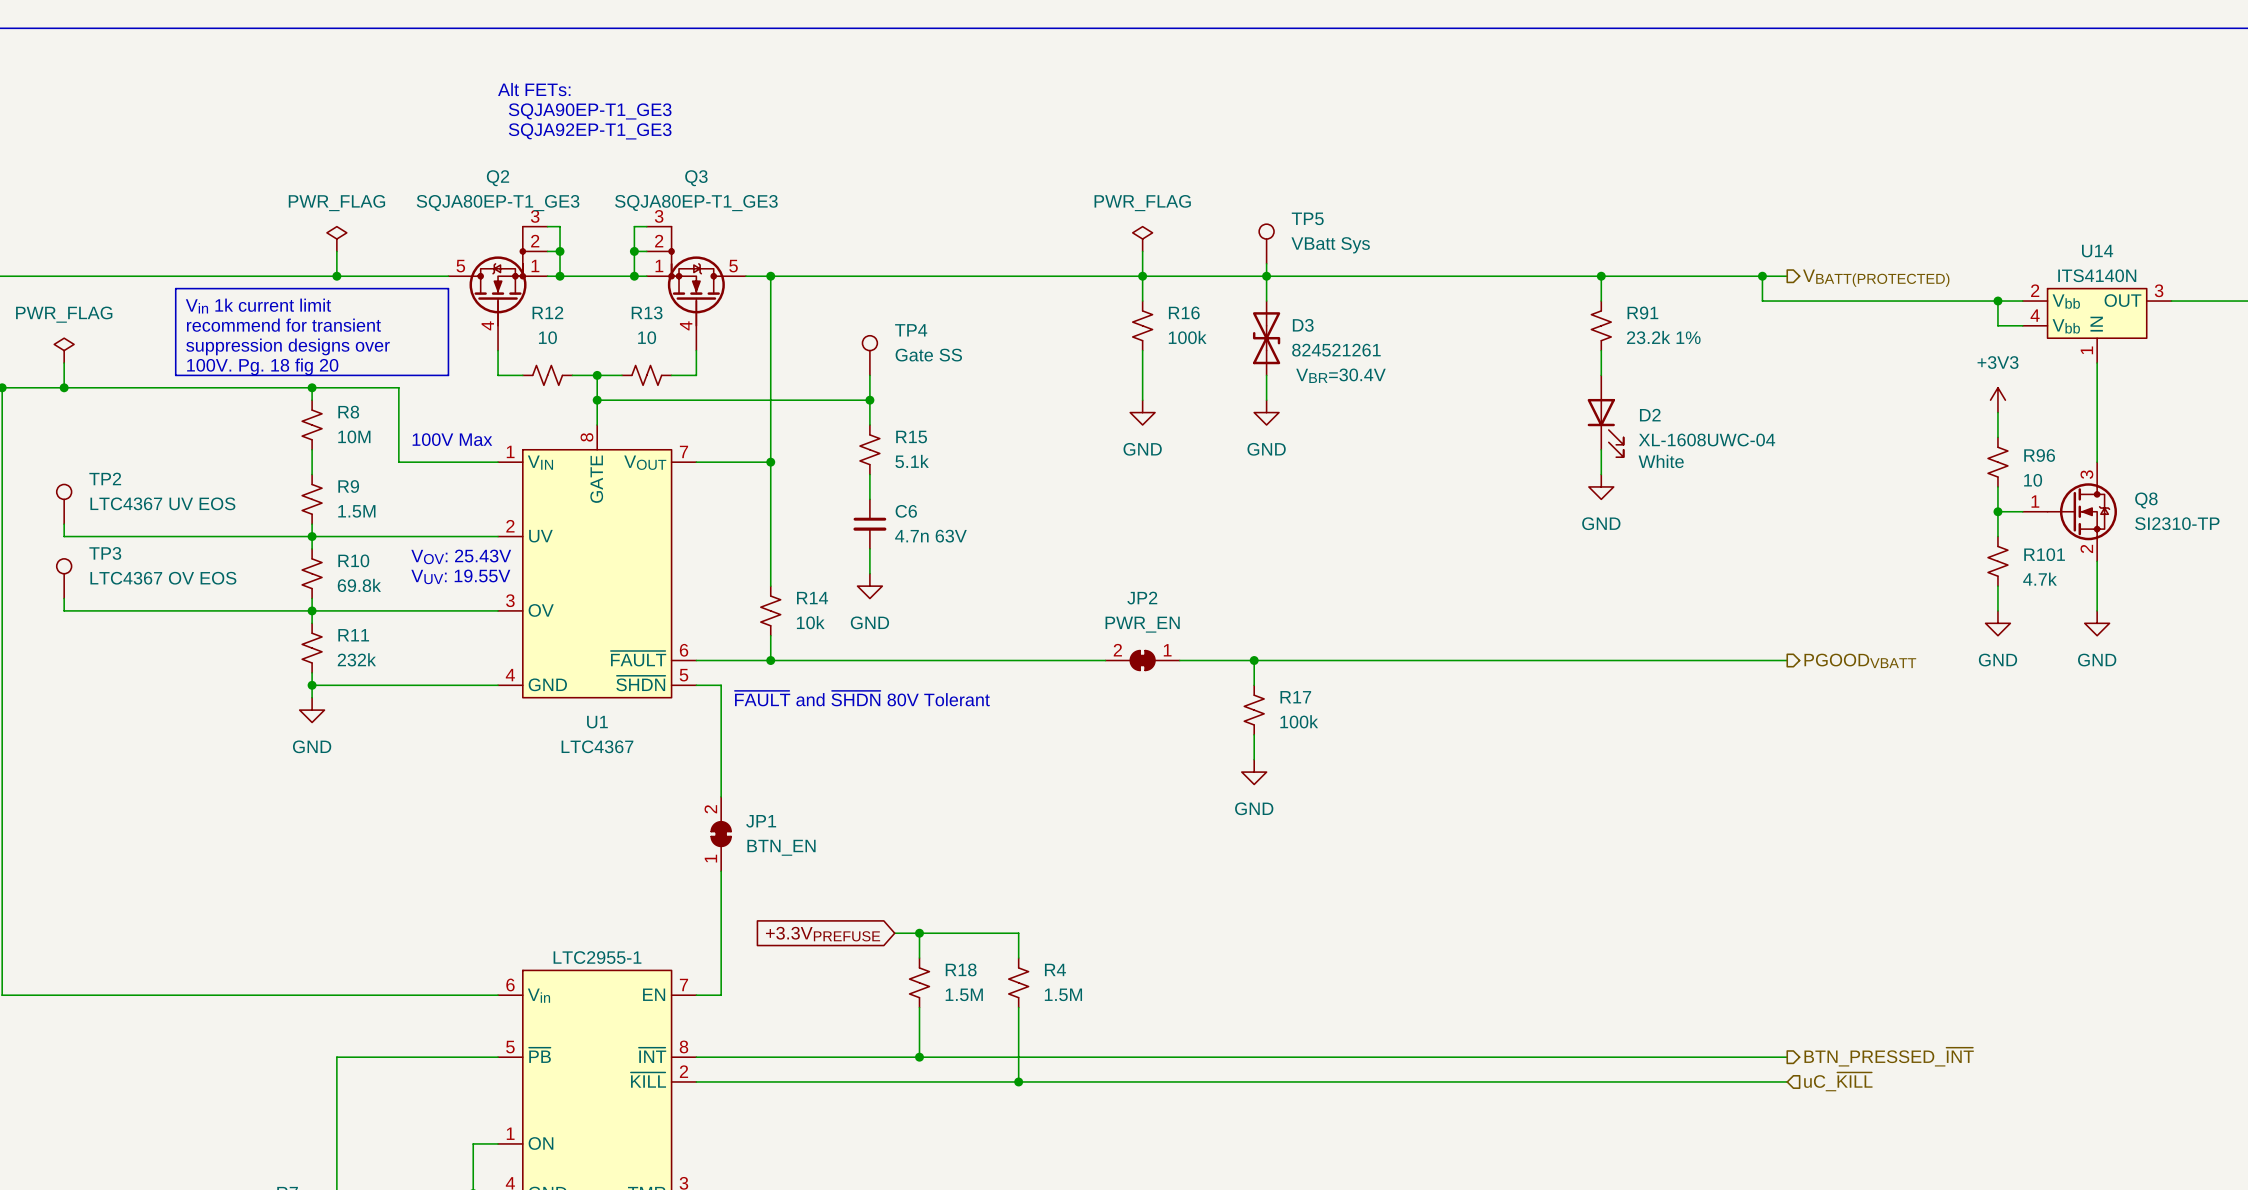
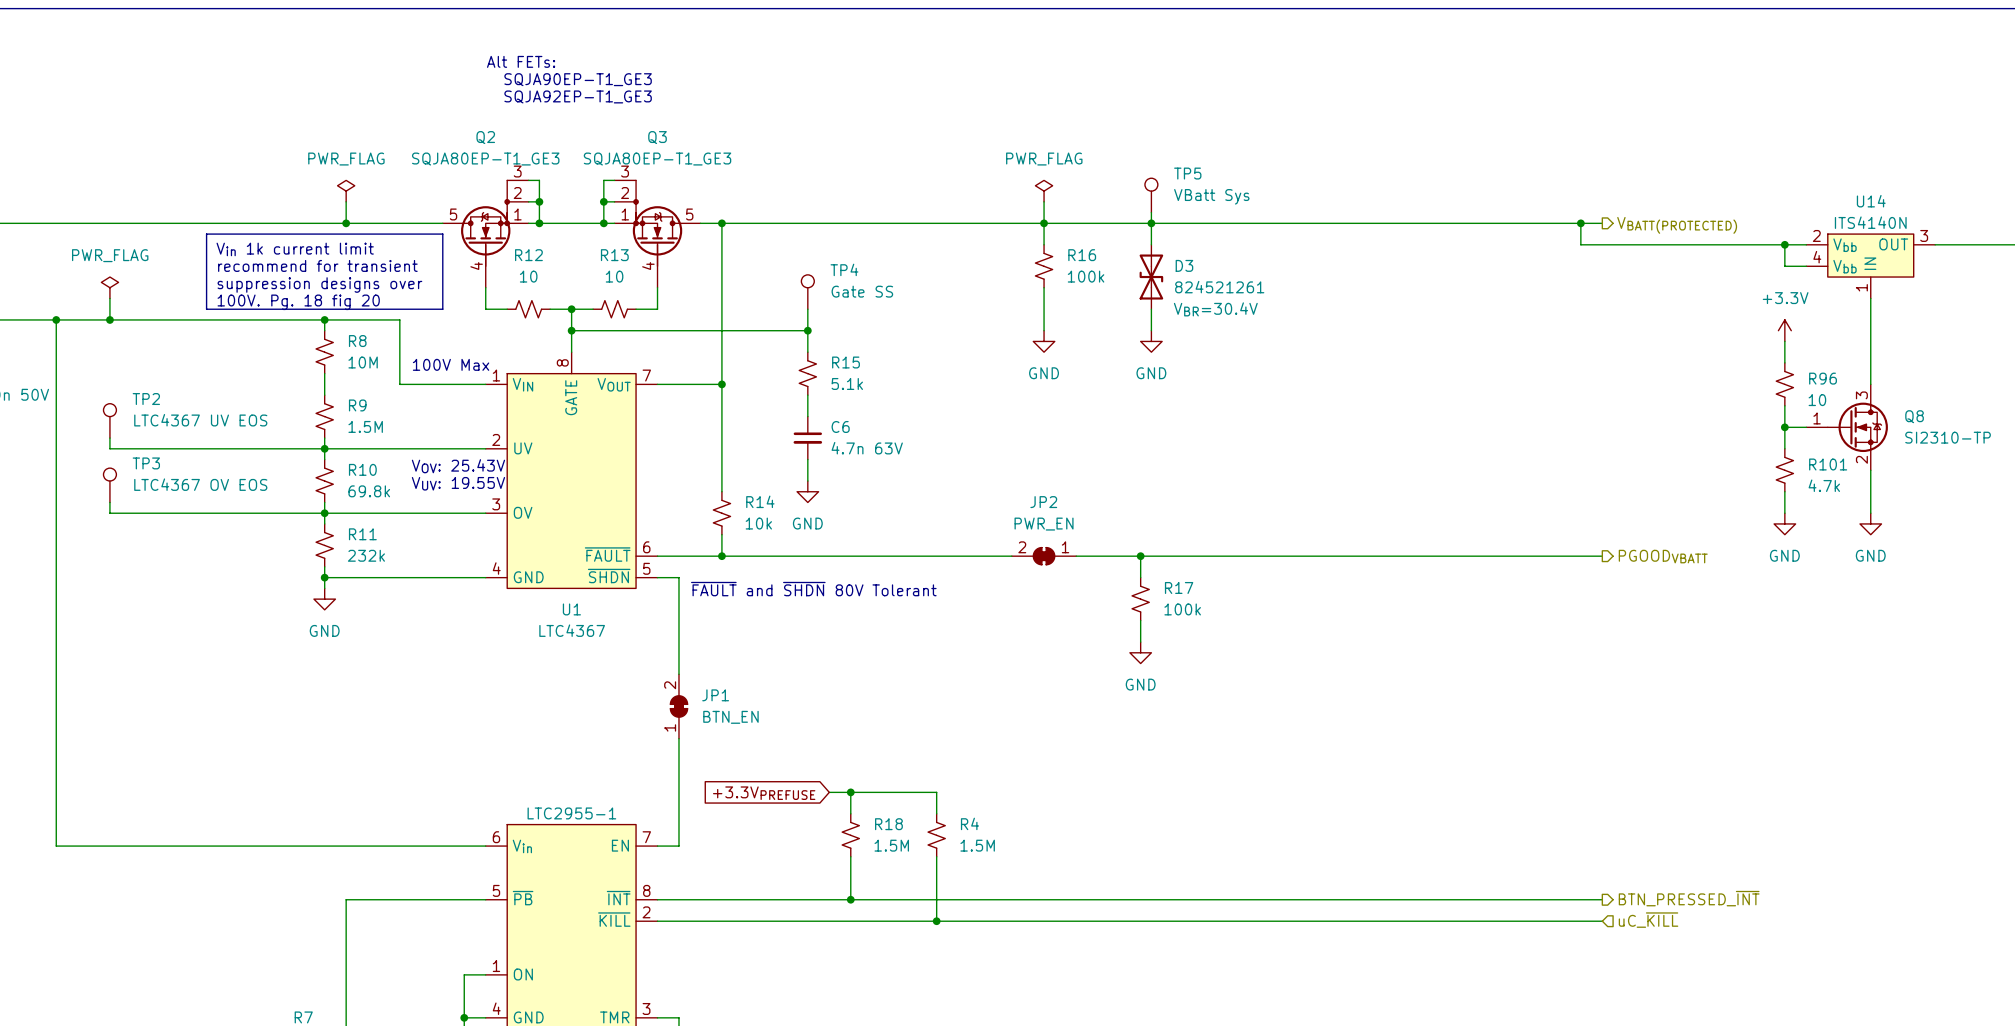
wire: (1601, 276) (1601, 301) -> none
junction: (1601, 276) -> none
R91: 23.2k 1% (1601, 325) -> none
wire: (1601, 350) (1601, 375) -> none
power symbol: +3V3 (1997, 400) -> +3.3V (1784, 330)
D2: XL-1608UWC-04 (1605, 416) -> none
wire: (1601, 449) (1601, 474) -> none
power symbol: GND (1601, 486) -> none

